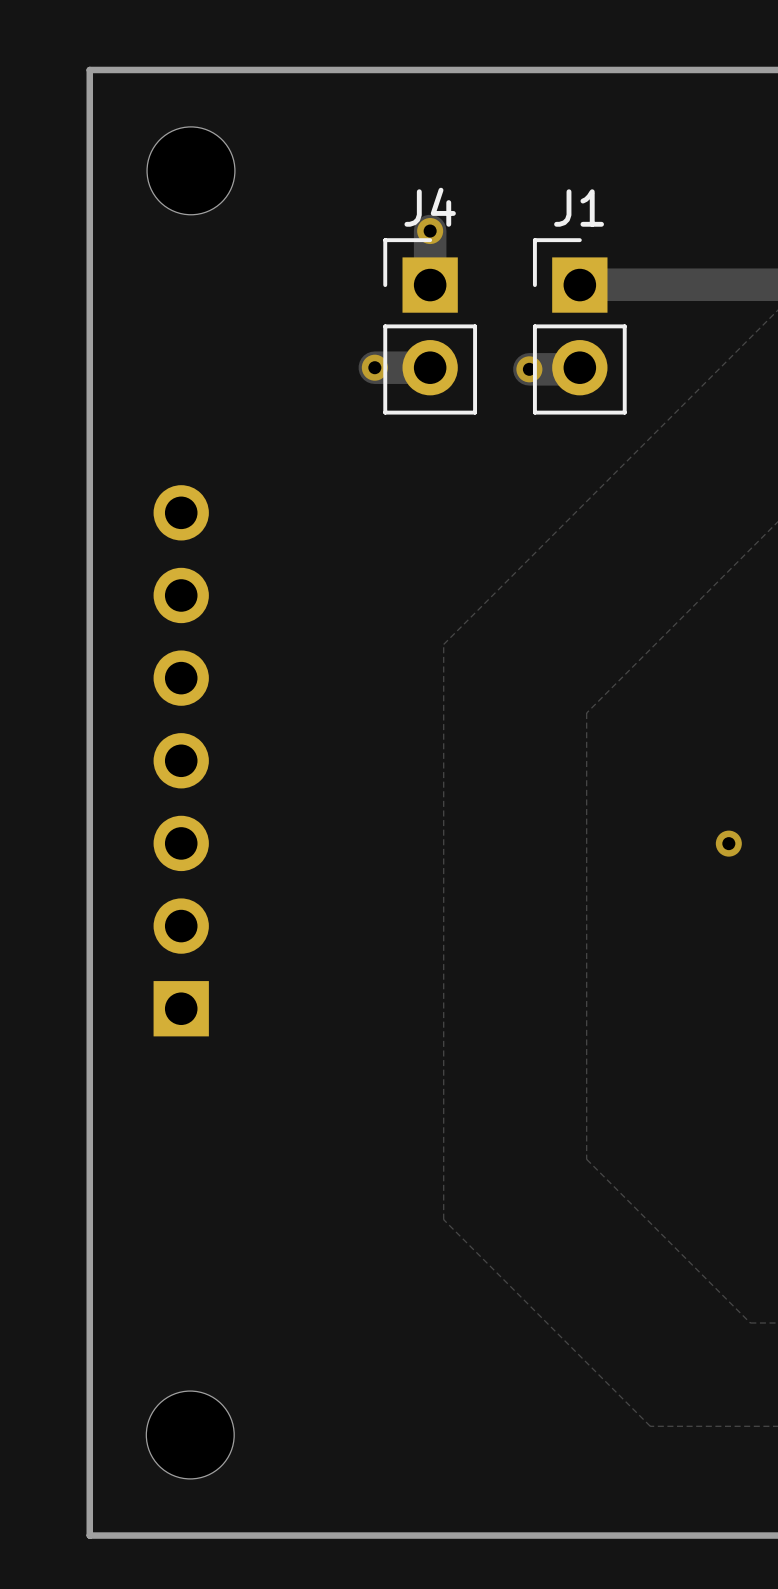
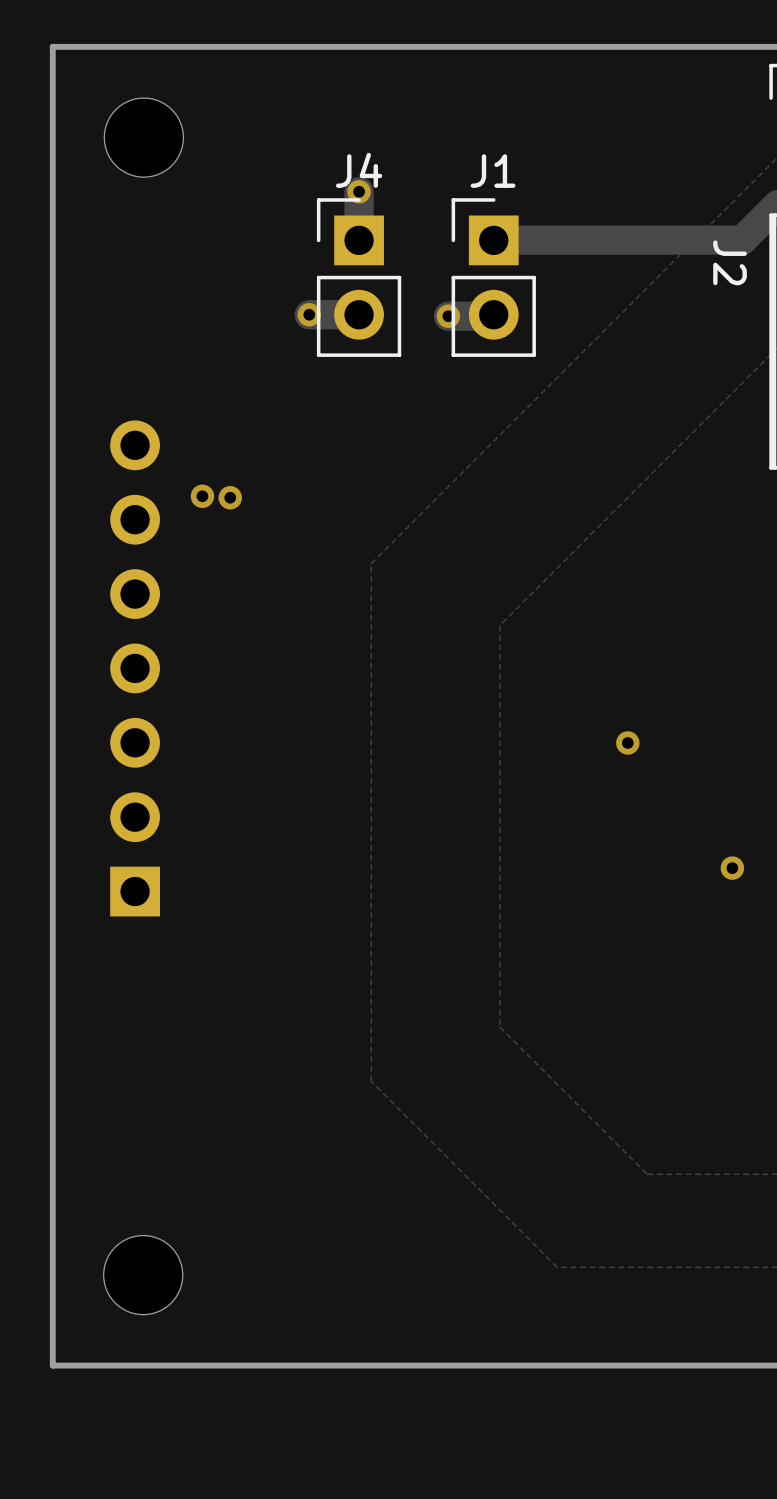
via: none -> (202, 496)
via: none -> (230, 497)

